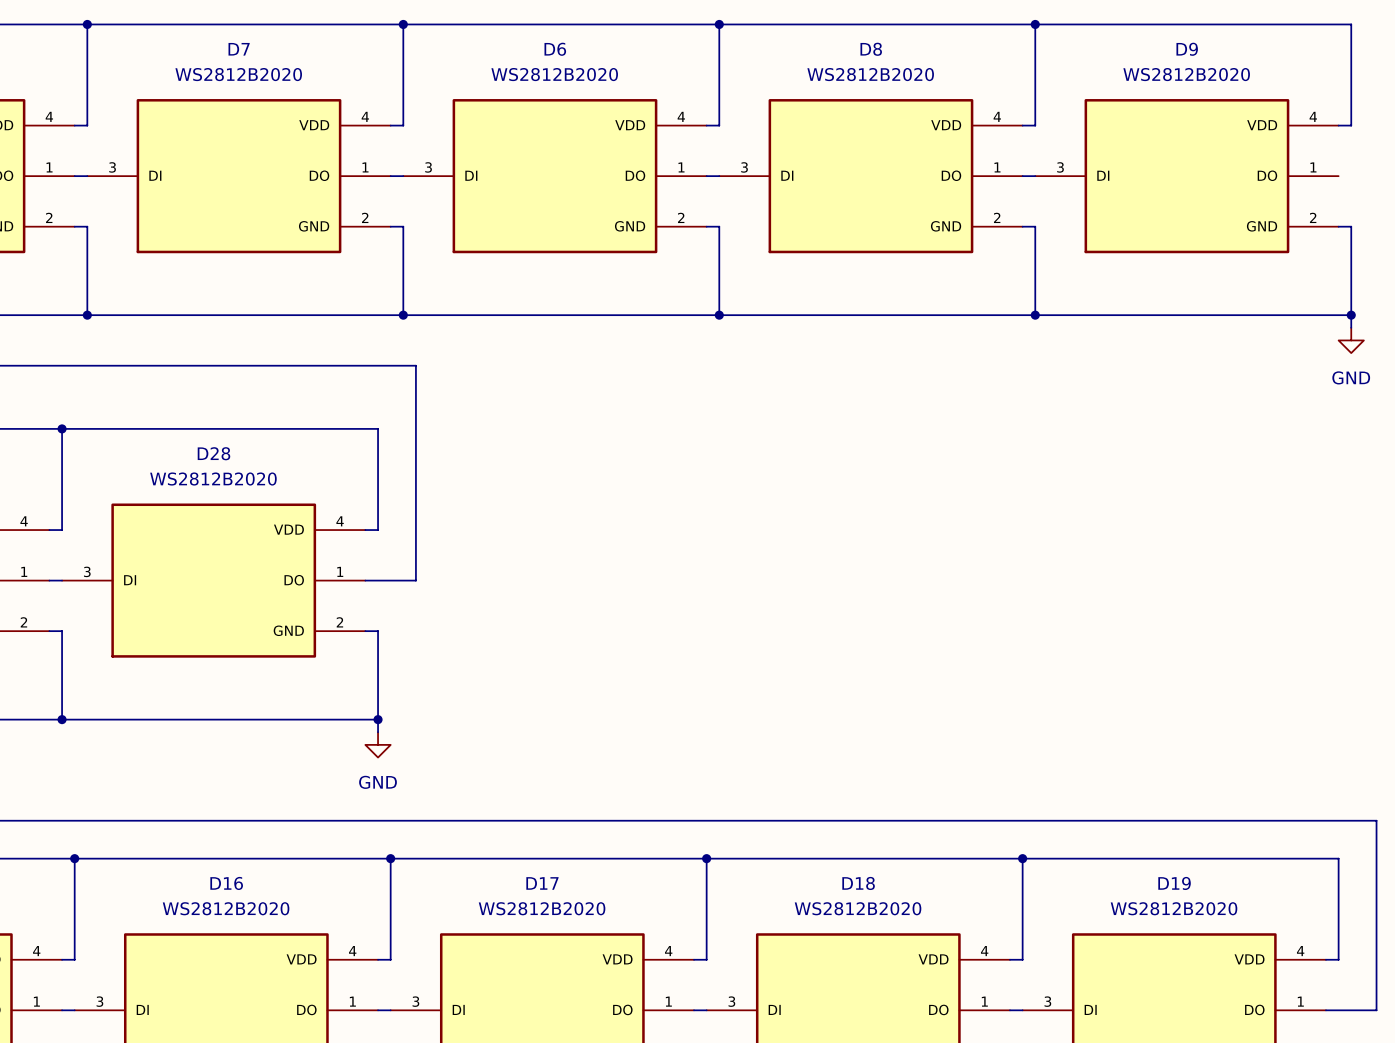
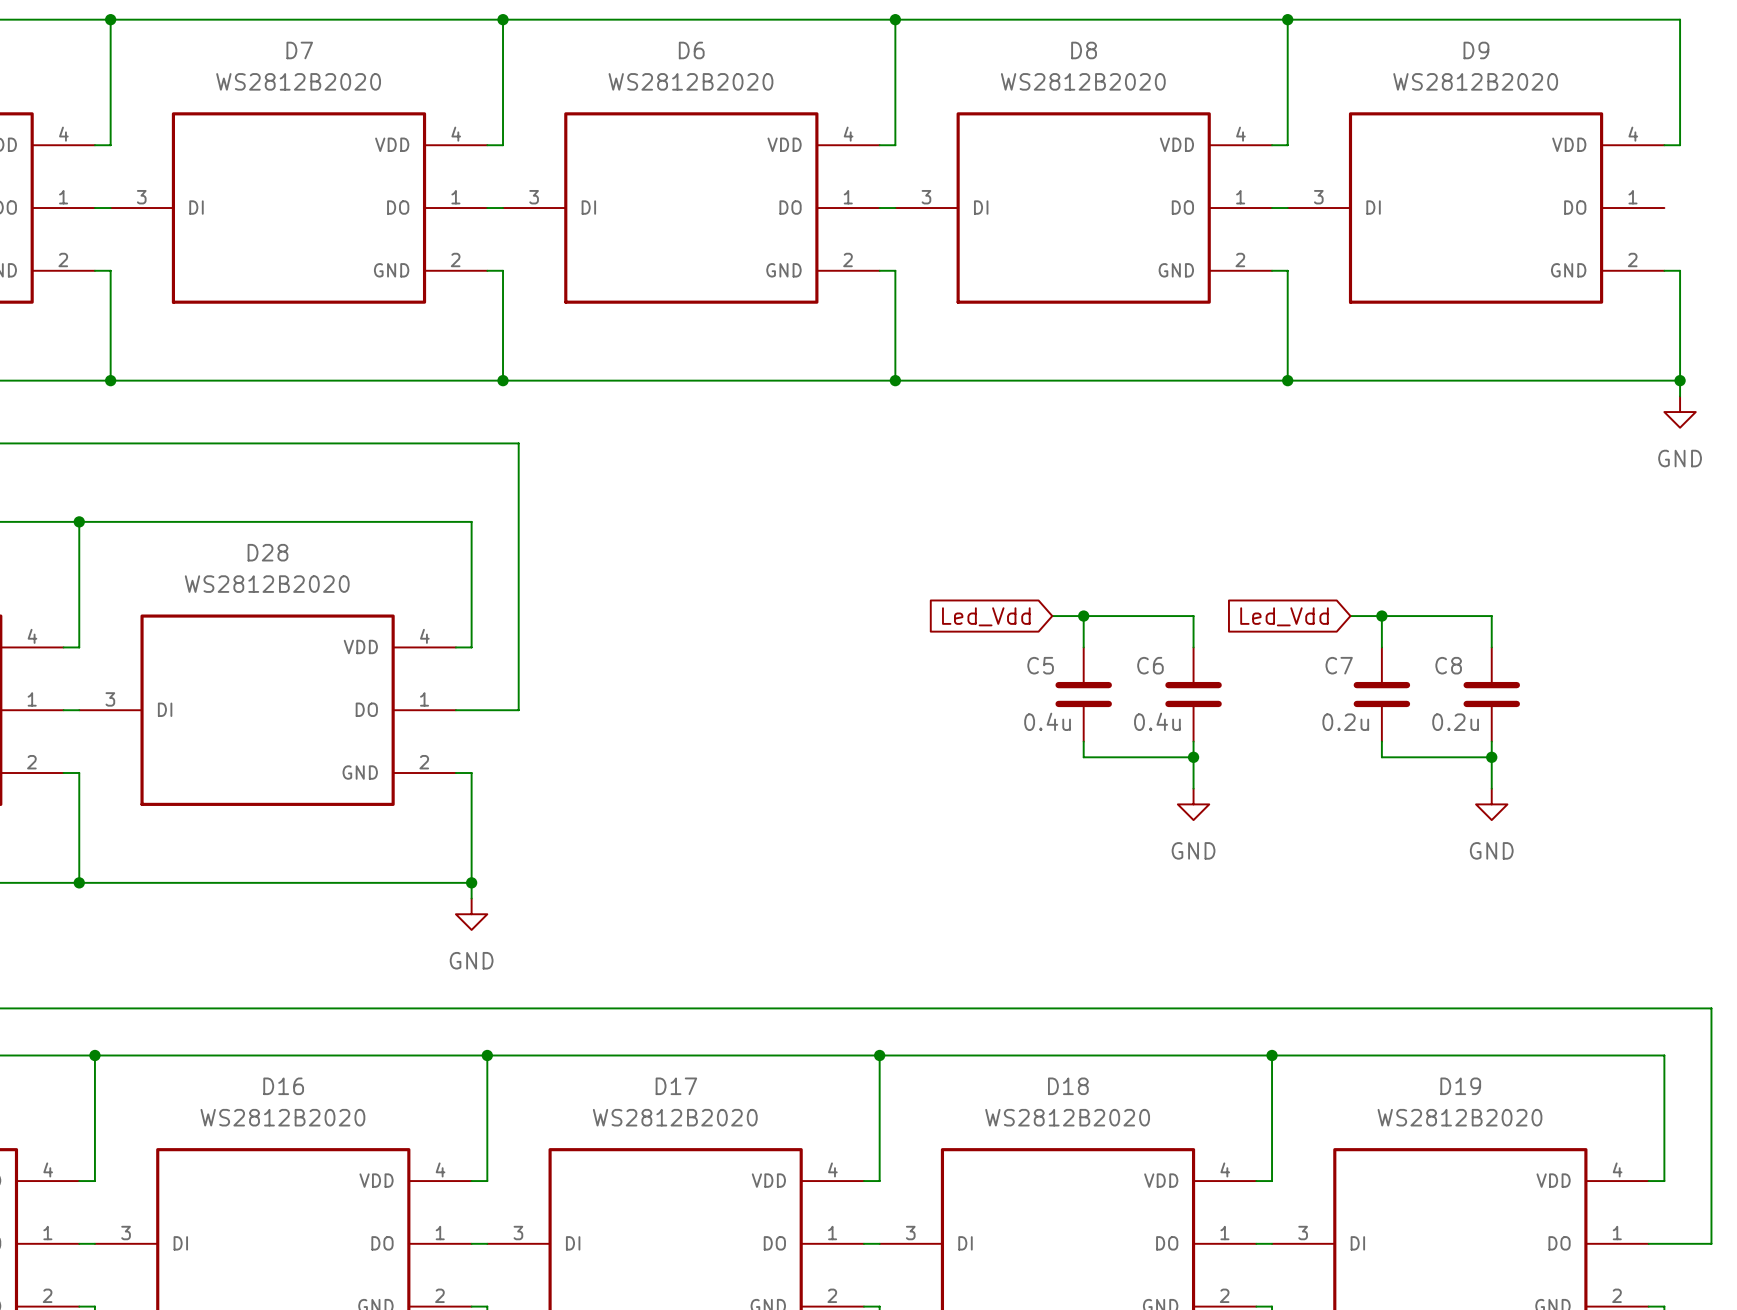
wire: none -> (1052, 616) (1193, 616) (1193, 647)
wire: none -> (1083, 616) (1083, 647)
junction: none -> (1083, 616)
wire: none -> (1350, 616) (1491, 616) (1491, 647)
wire: none -> (1381, 616) (1381, 647)
junction: none -> (1381, 616)
global label: none -> Led_Vdd (986, 616)
global label: none -> Led_Vdd (1284, 616)
C5: none -> 0.4u (1083, 694)
C6: none -> 0.4u (1193, 694)
C7: none -> 0.2u (1381, 694)
C8: none -> 0.2u (1491, 694)
wire: none -> (1083, 741) (1083, 757) (1193, 757)
wire: none -> (1193, 741) (1193, 788)
wire: none -> (1381, 741) (1381, 757) (1491, 757)
wire: none -> (1491, 741) (1491, 788)
junction: none -> (1193, 757)
junction: none -> (1491, 757)
power symbol: none -> GND (1193, 804)
power symbol: none -> GND (1491, 804)

